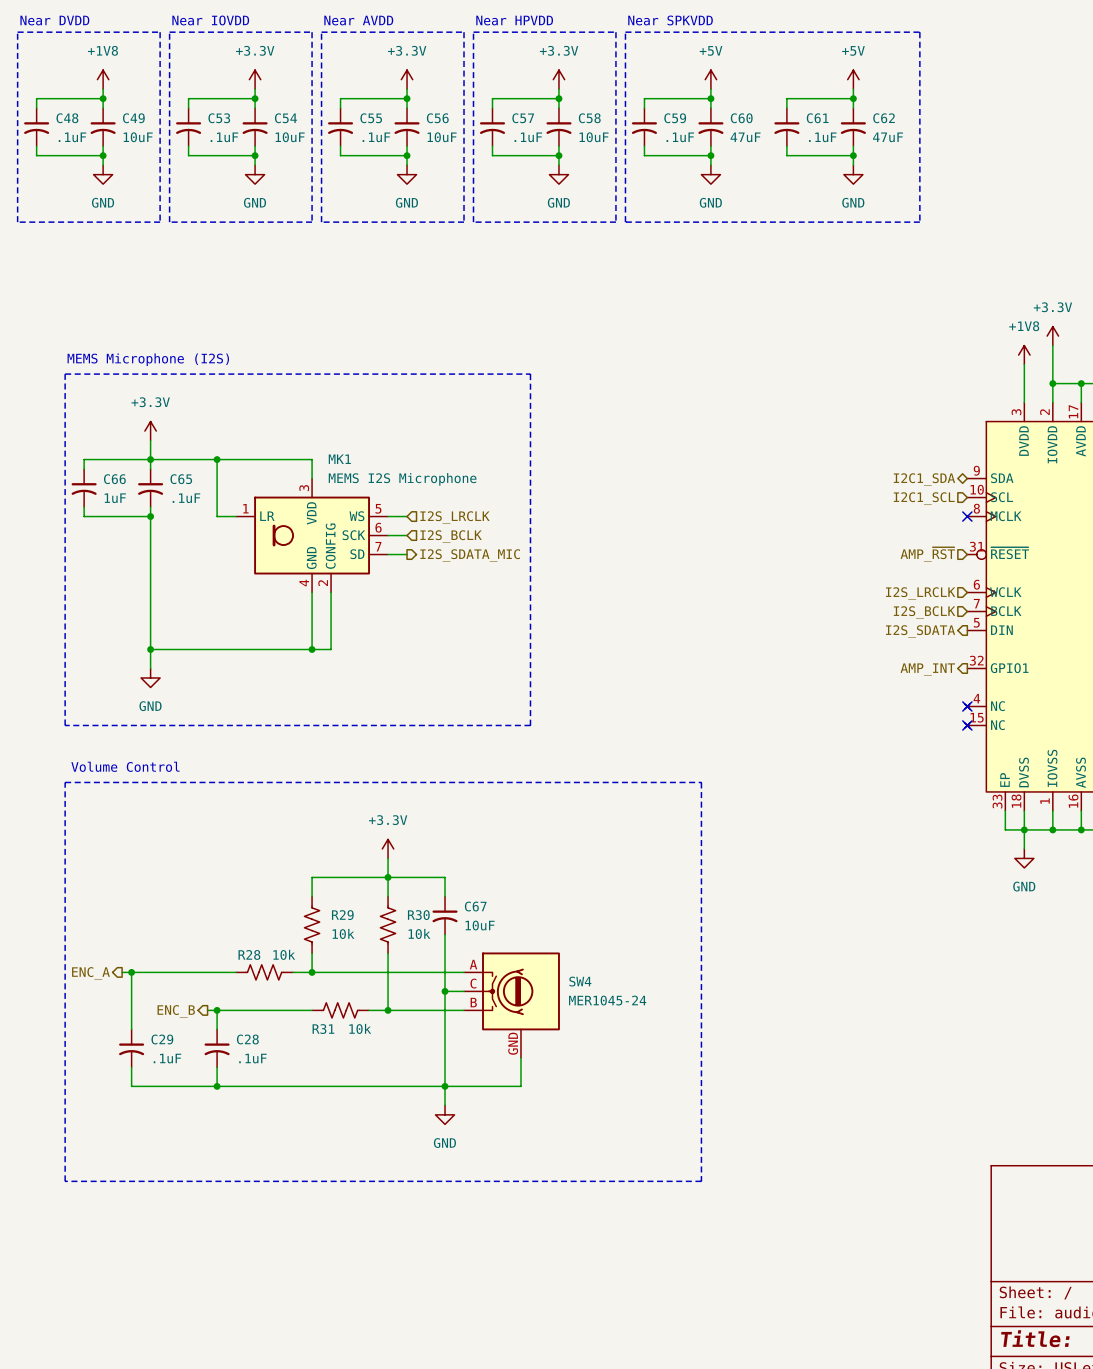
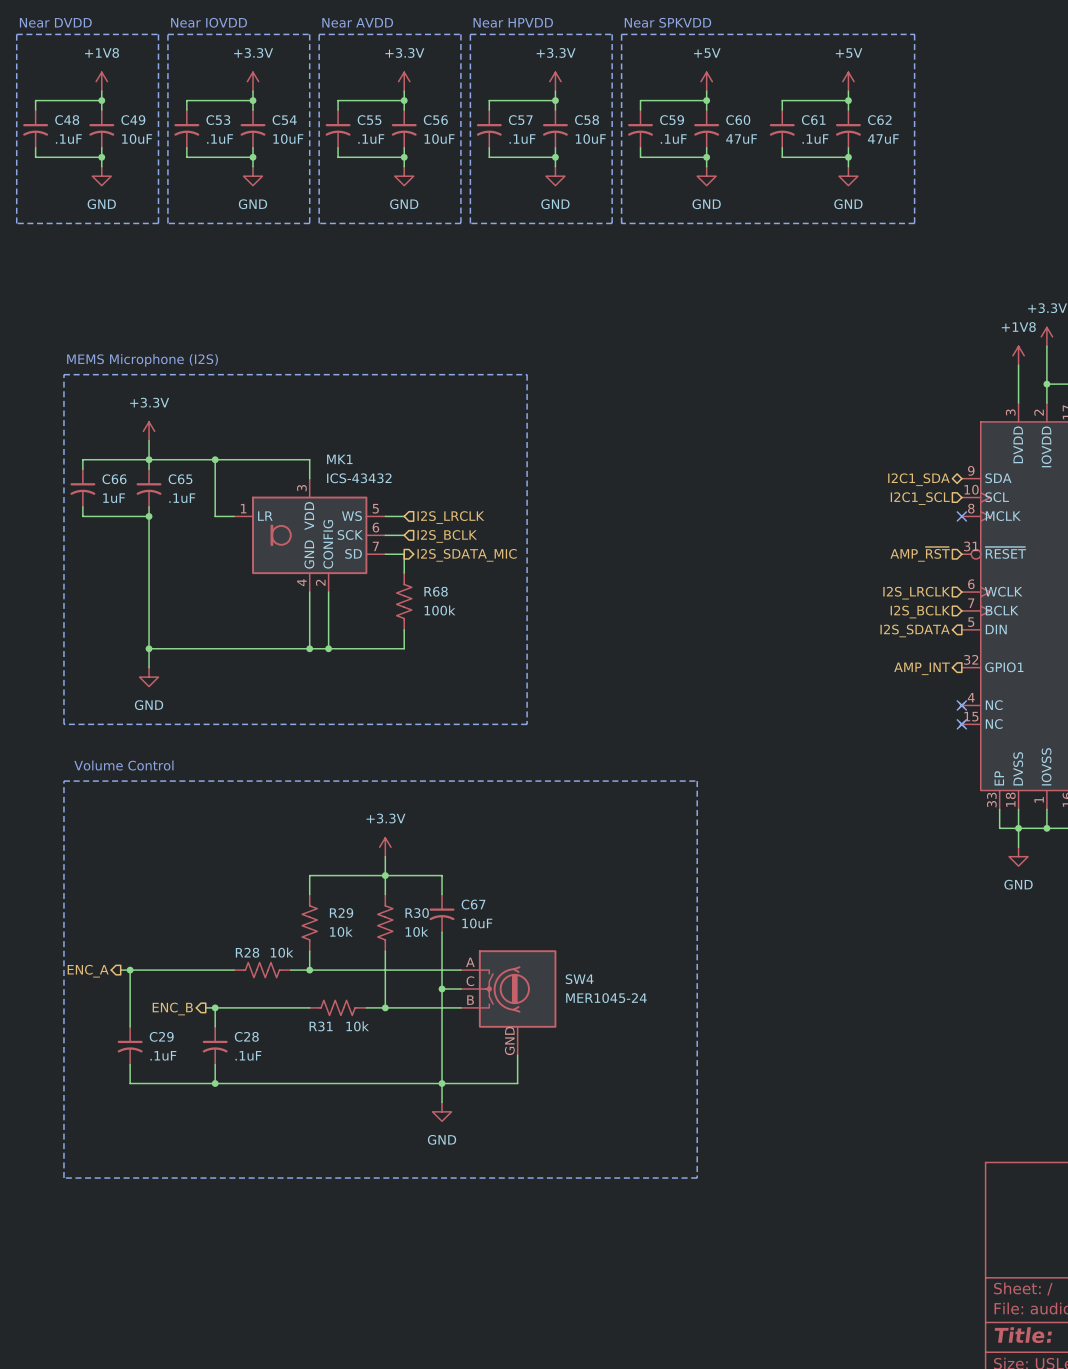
MK1 value: MEMS I2S Microphone (402, 479) -> ICS-43432 (359, 478)
wire: none -> (404, 554) (404, 573)
R68: none -> 100k (404, 601)
wire: none -> (404, 629) (404, 648) (328, 648)
junction: none -> (328, 648)

